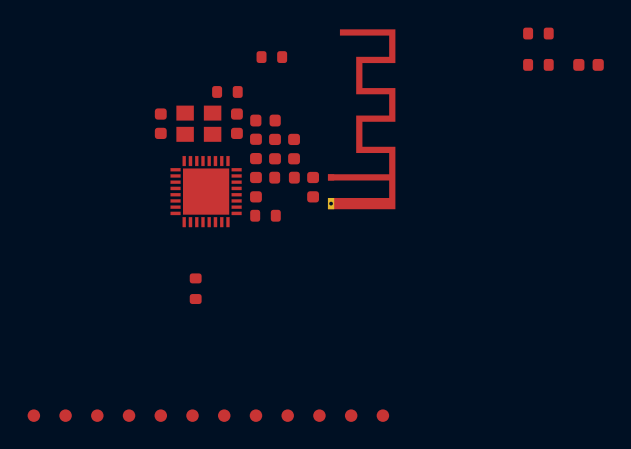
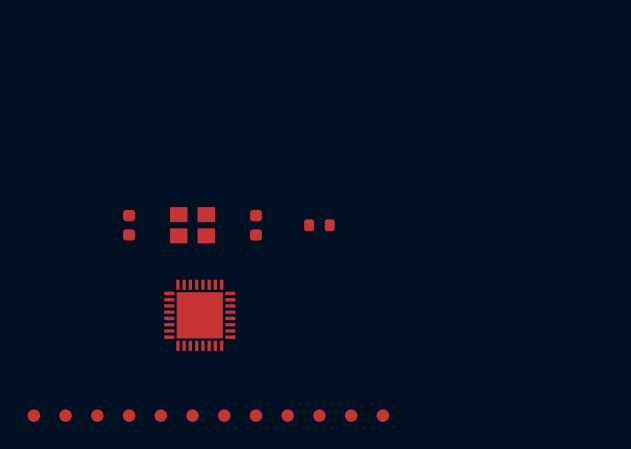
part: (538, 33) -> none
part: (271, 57) -> none
part: (538, 64) -> none
part: (588, 64) -> none
part: (227, 91) -> none
part: (361, 119) -> none
part: (265, 120) -> none
part: (160, 123) -> none
part position: (198, 123) -> (192, 225)
part: (236, 123) -> none
part: (255, 148) -> none
part: (275, 149) -> none
part: (294, 149) -> none
part: (284, 177) -> none
part: (255, 187) -> none
part: (313, 187) -> none
part position: (206, 191) -> (199, 315)
part position: (265, 215) -> (319, 225)
part: none -> (129, 225)
part: none -> (255, 225)
part: (195, 288) -> none

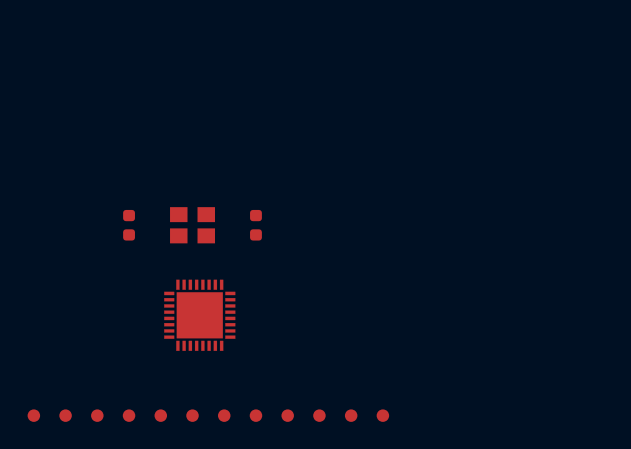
part: (319, 225) -> none

